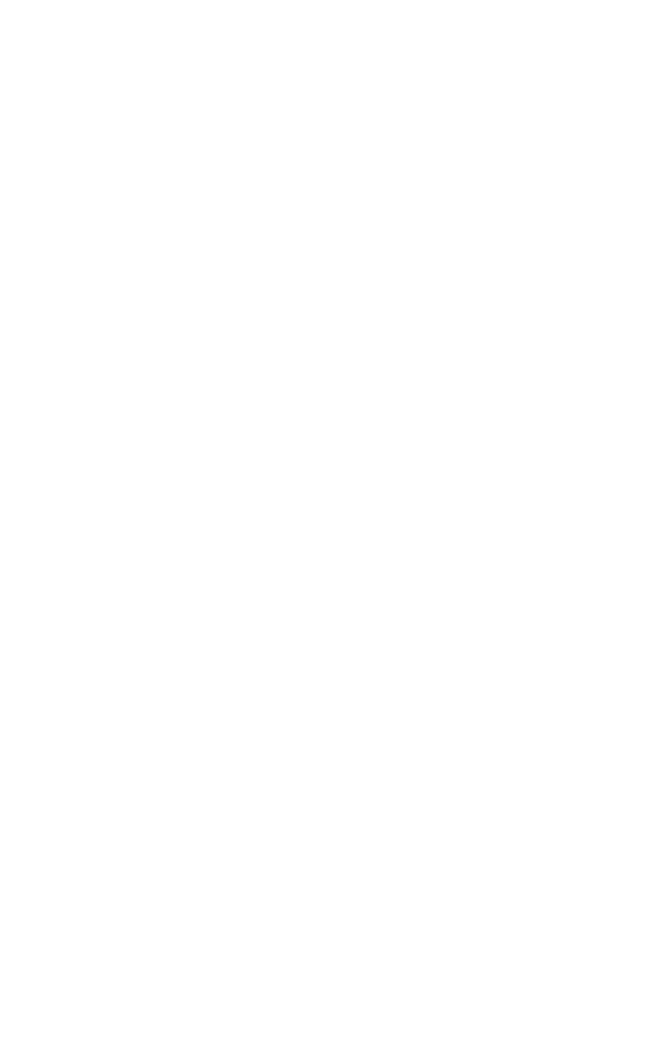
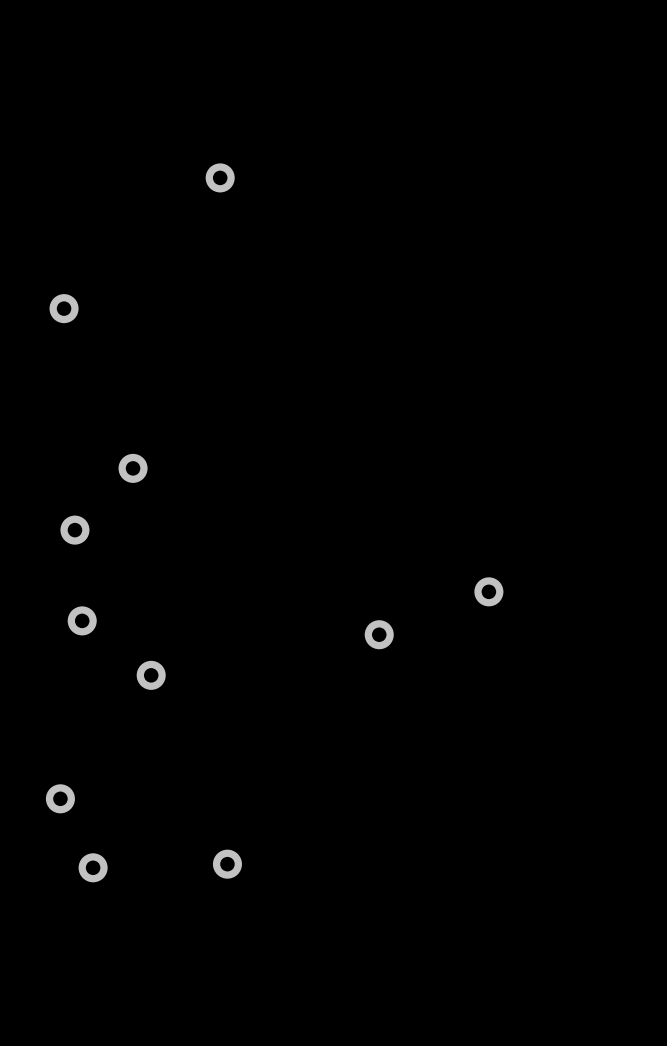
via: none -> (220, 177)
via: none -> (64, 308)
via: none -> (133, 468)
via: none -> (74, 530)
via: none -> (488, 591)
via: none -> (82, 620)
via: none -> (379, 634)
via: none -> (151, 675)
via: none -> (60, 798)
via: none -> (227, 864)
via: none -> (93, 867)

